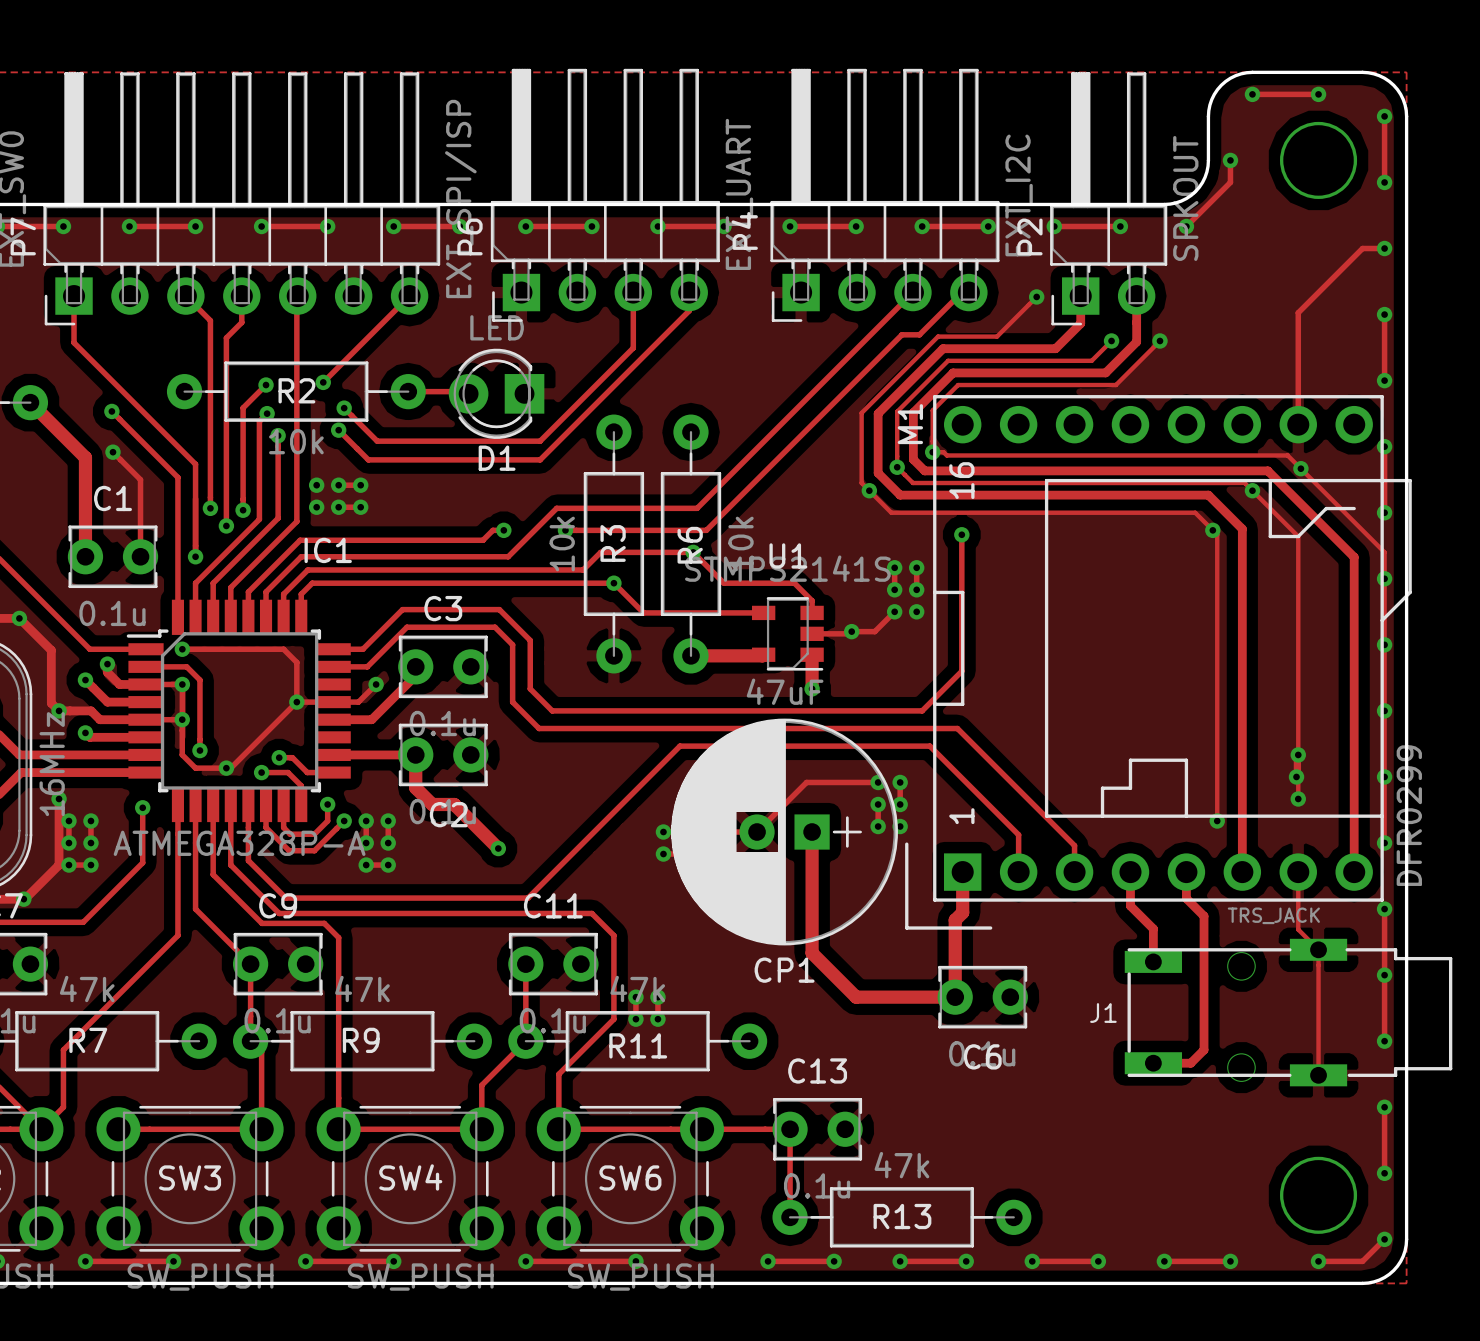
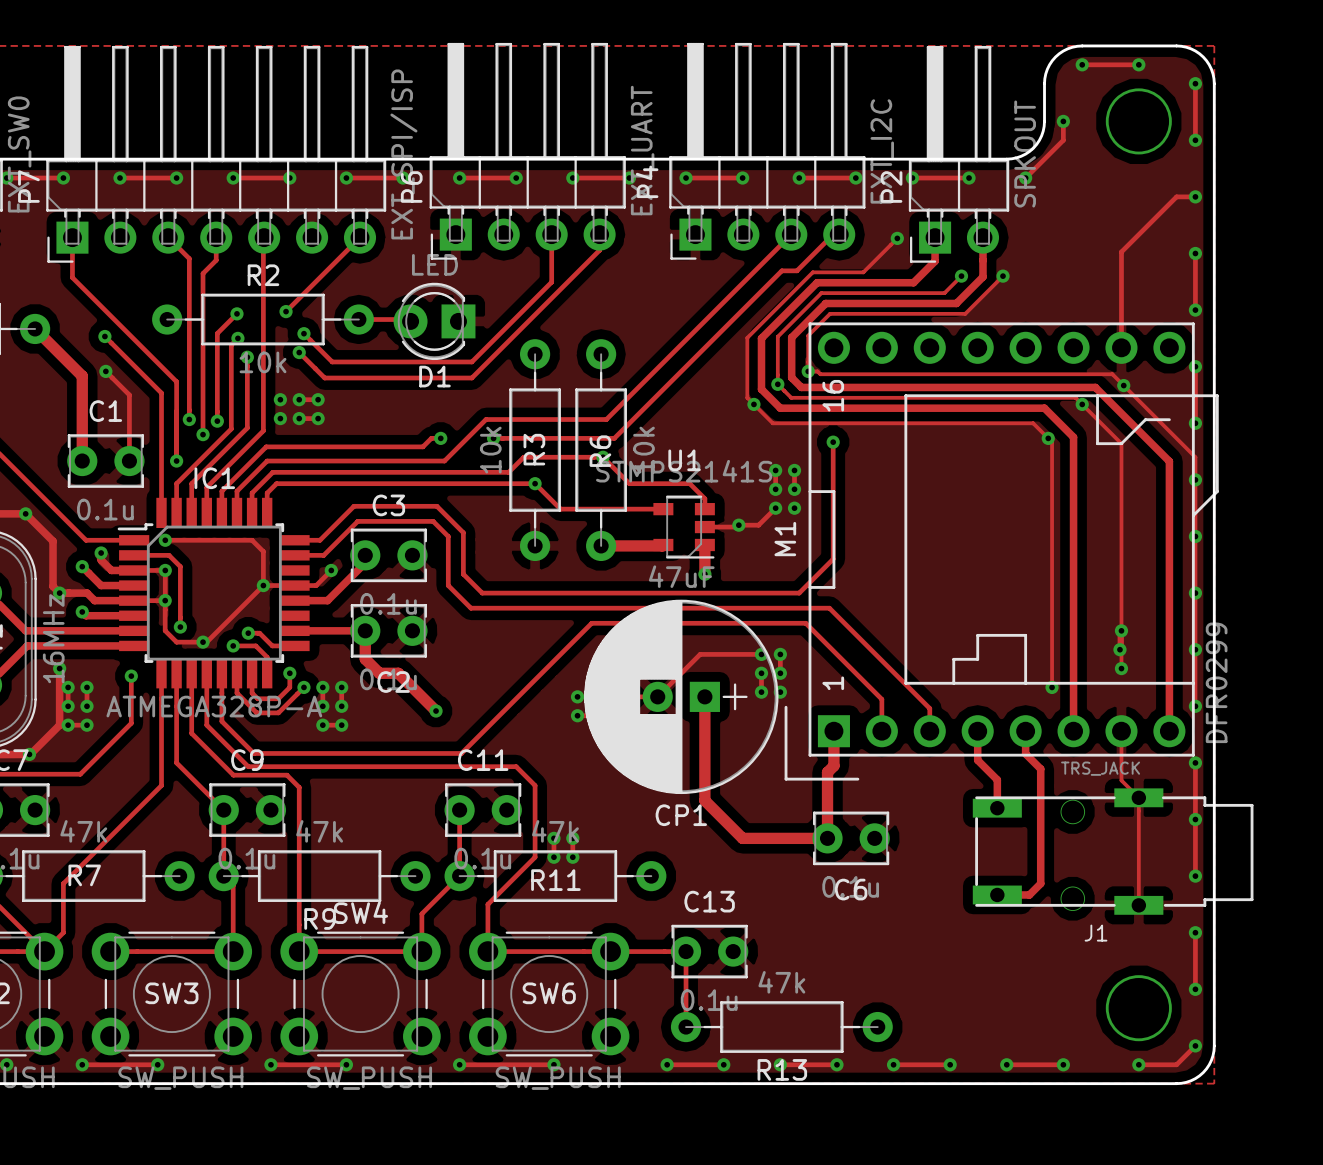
R2 name position: R2 (296, 390) -> R2 (263, 275)
M1 name position: M1 (910, 424) -> M1 (785, 539)
IC1 name position: IC1 (328, 550) -> IC1 (214, 478)
J1 name position: J1 (1103, 1013) -> J1 (1096, 933)
R9 name position: R9 (361, 1040) -> R9 (320, 918)
SW4 name position: SW4 (410, 1177) -> SW4 (361, 912)
R13 name position: R13 (902, 1216) -> R13 (782, 1069)

